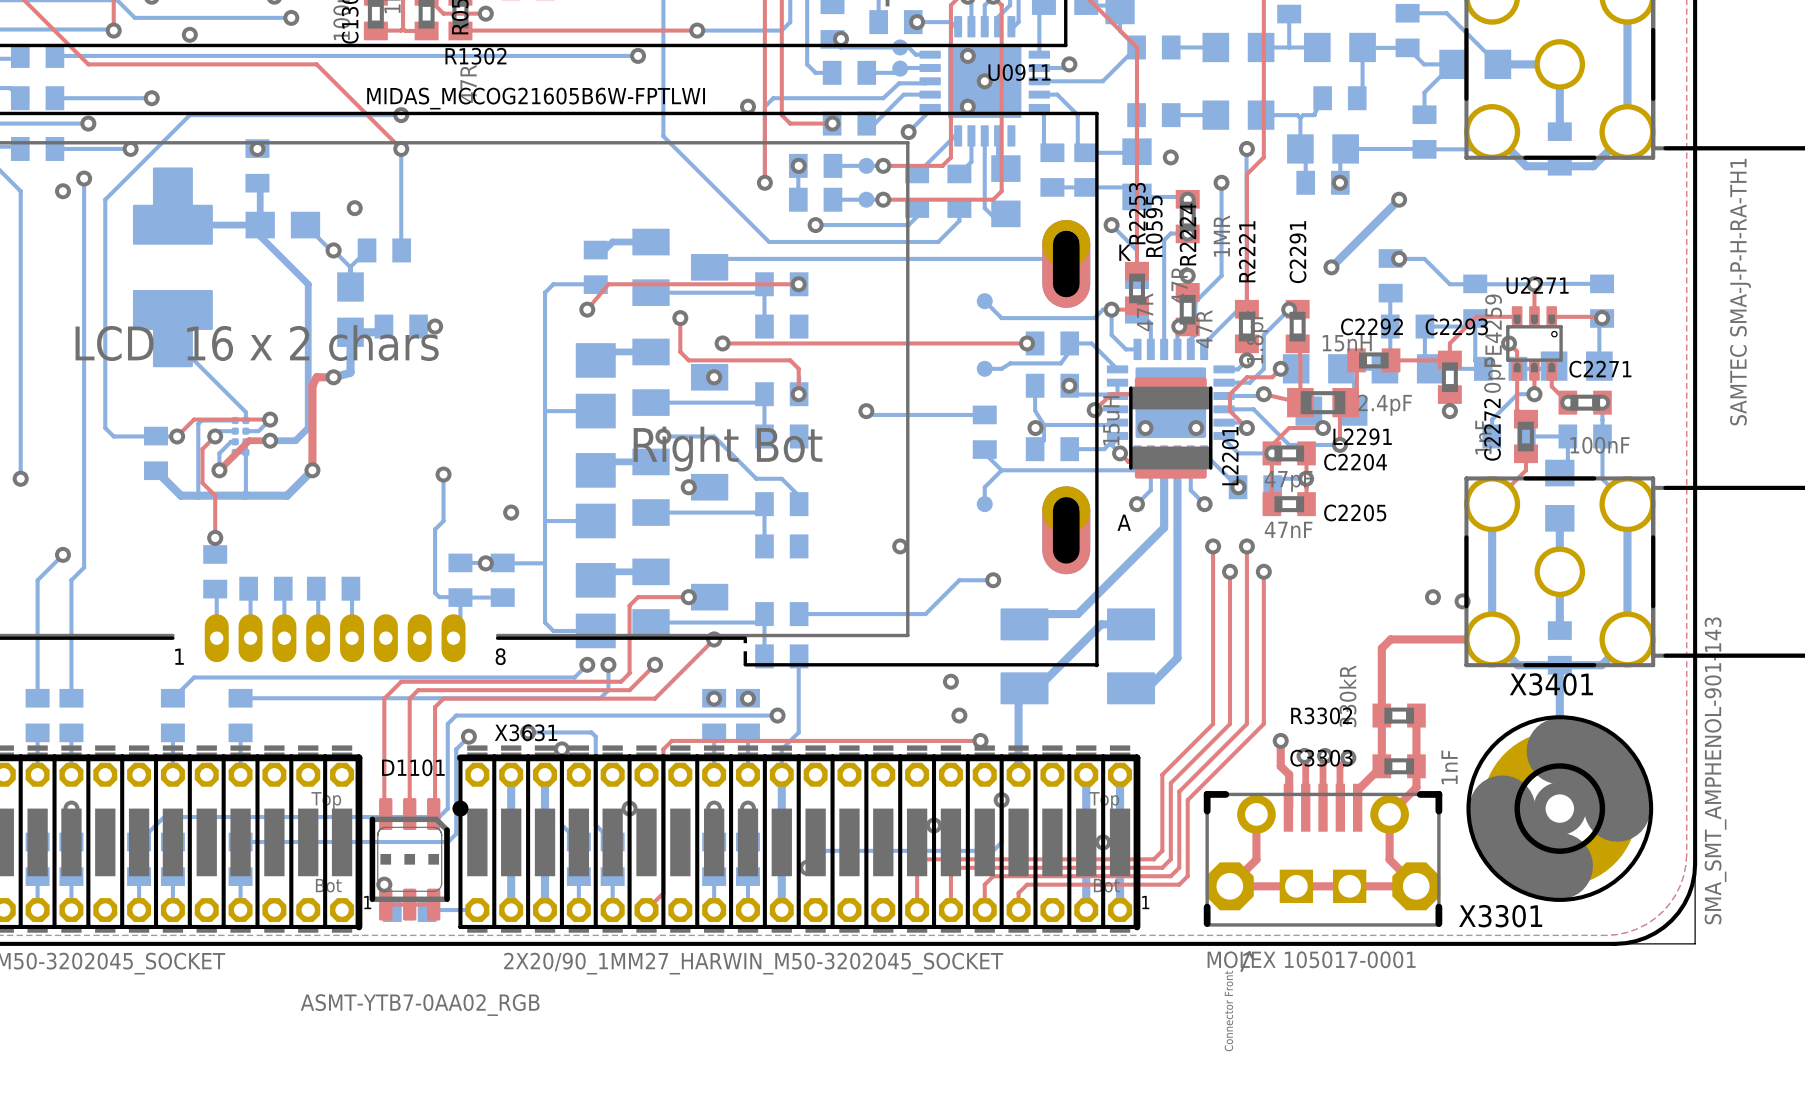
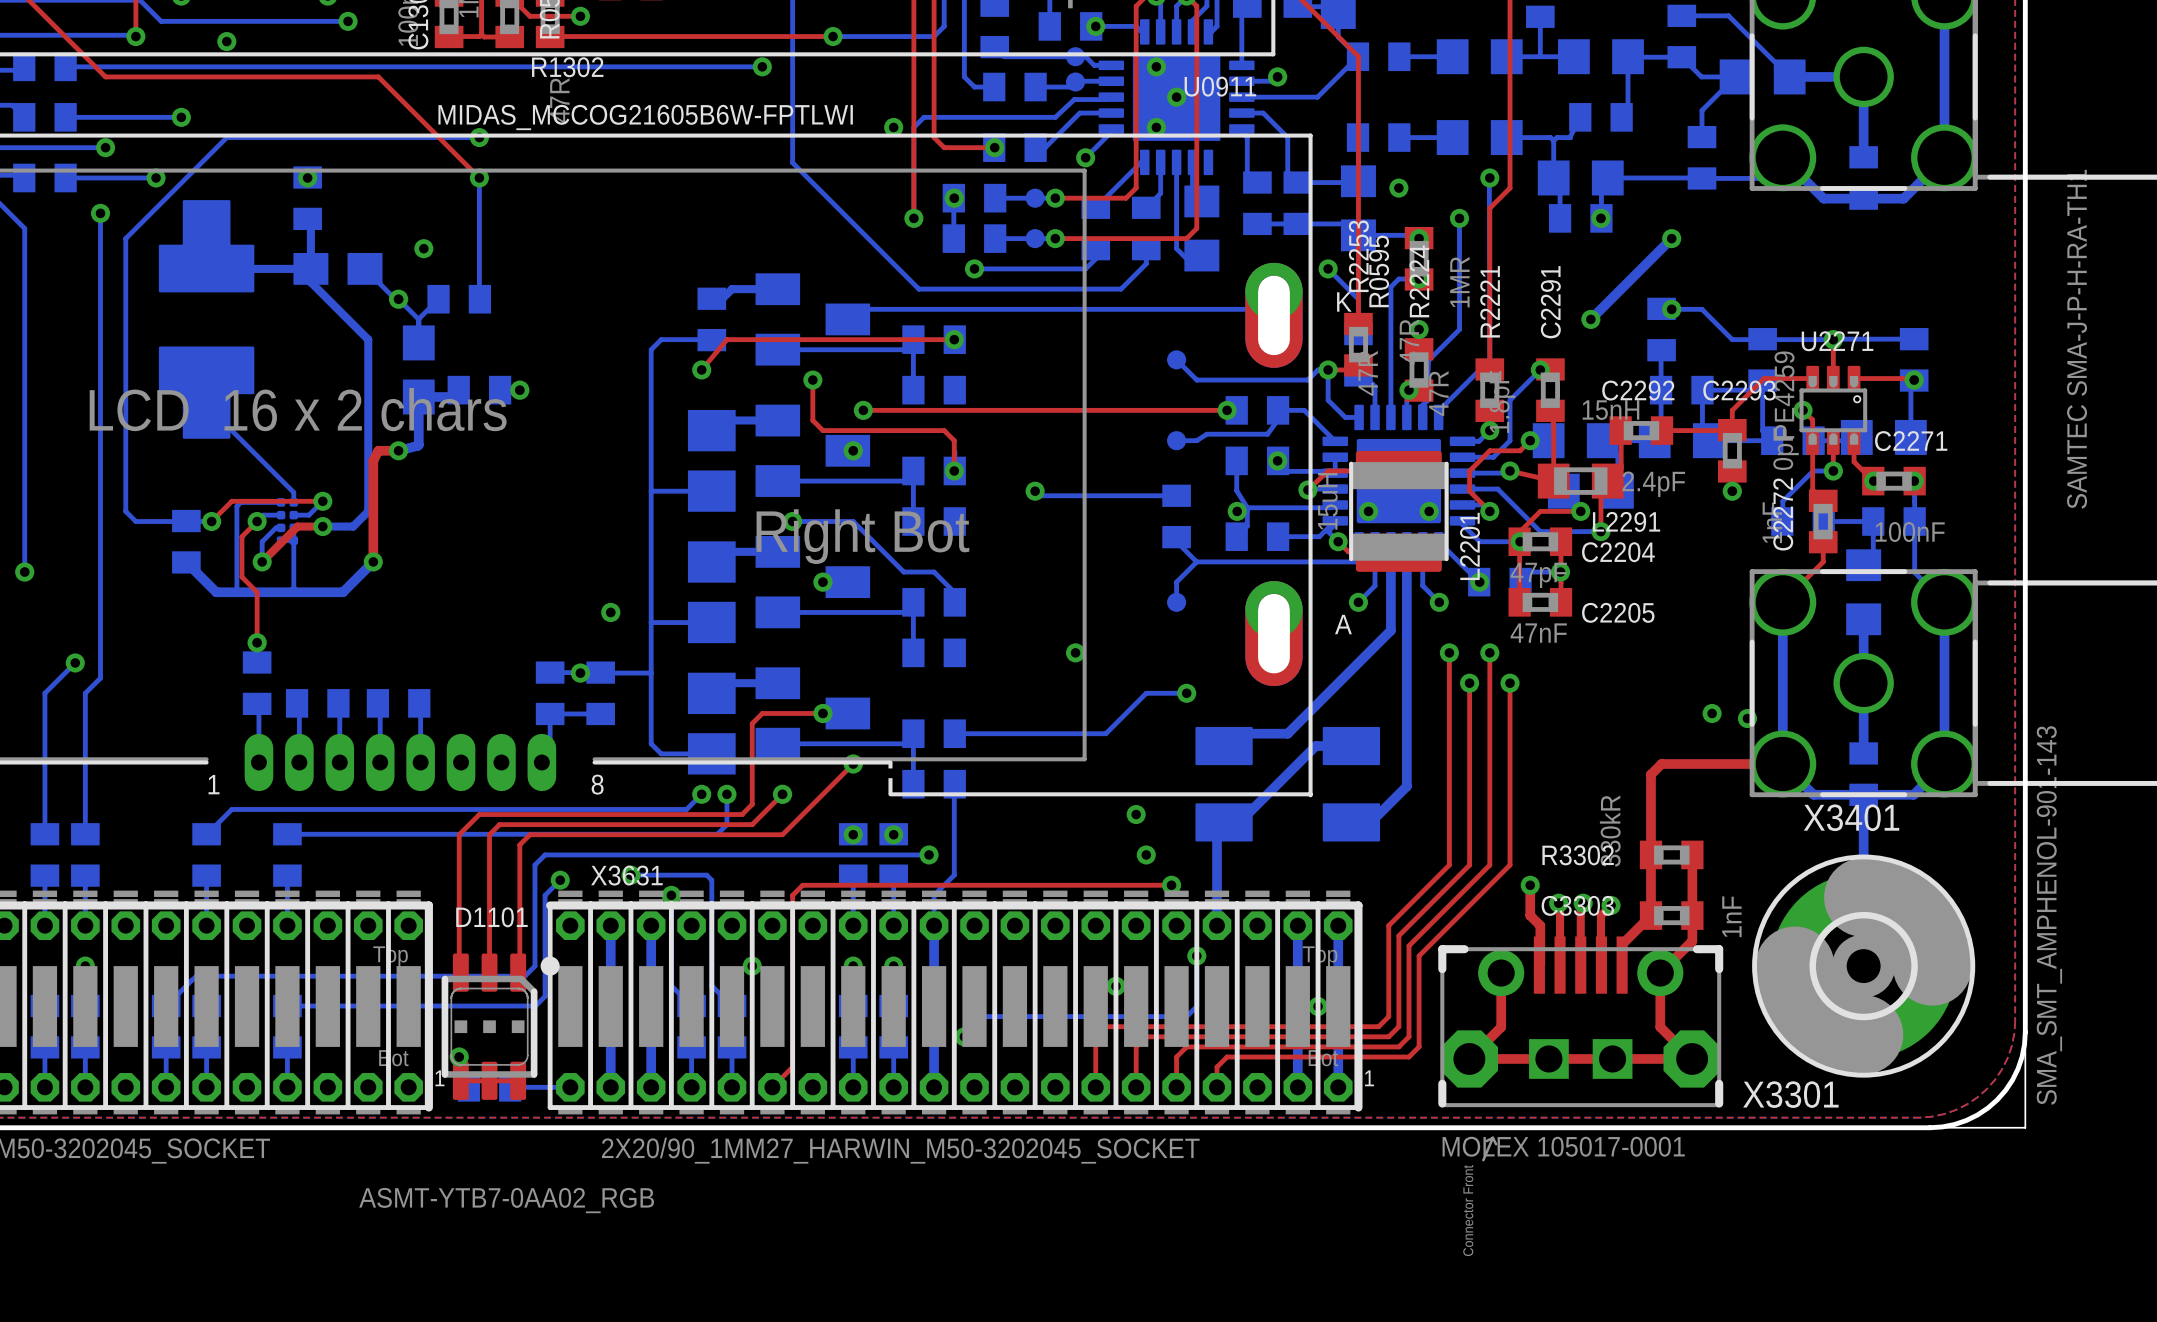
via: (840, 39) -> none
via: (62, 191) -> none
bottom track: (443, 474) (443, 521) (435, 529) (435, 592) (439, 597) (460, 597) -> none
via: (443, 474) -> none

